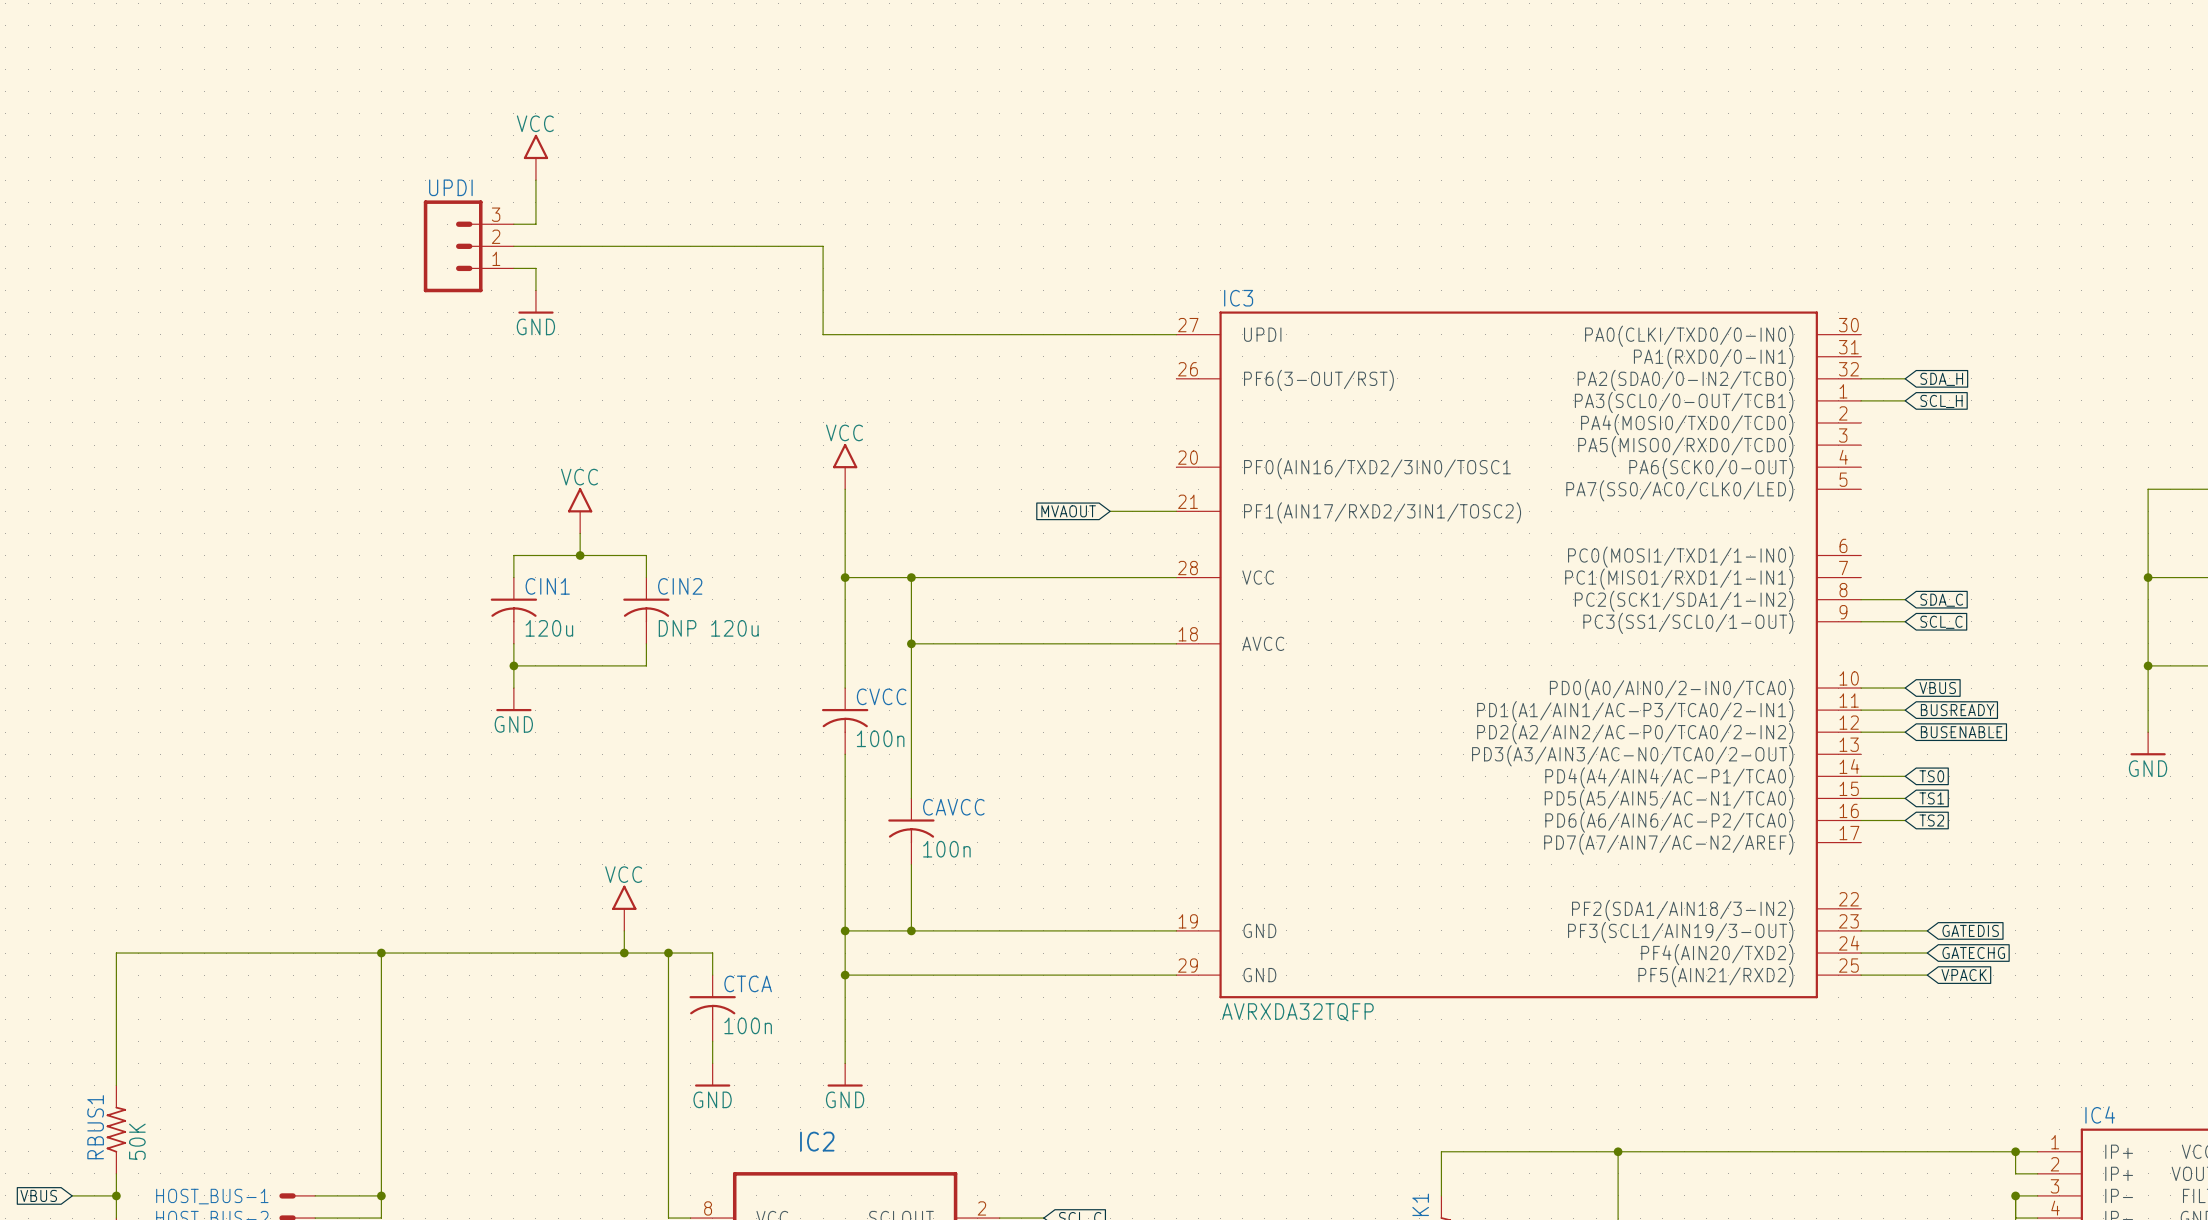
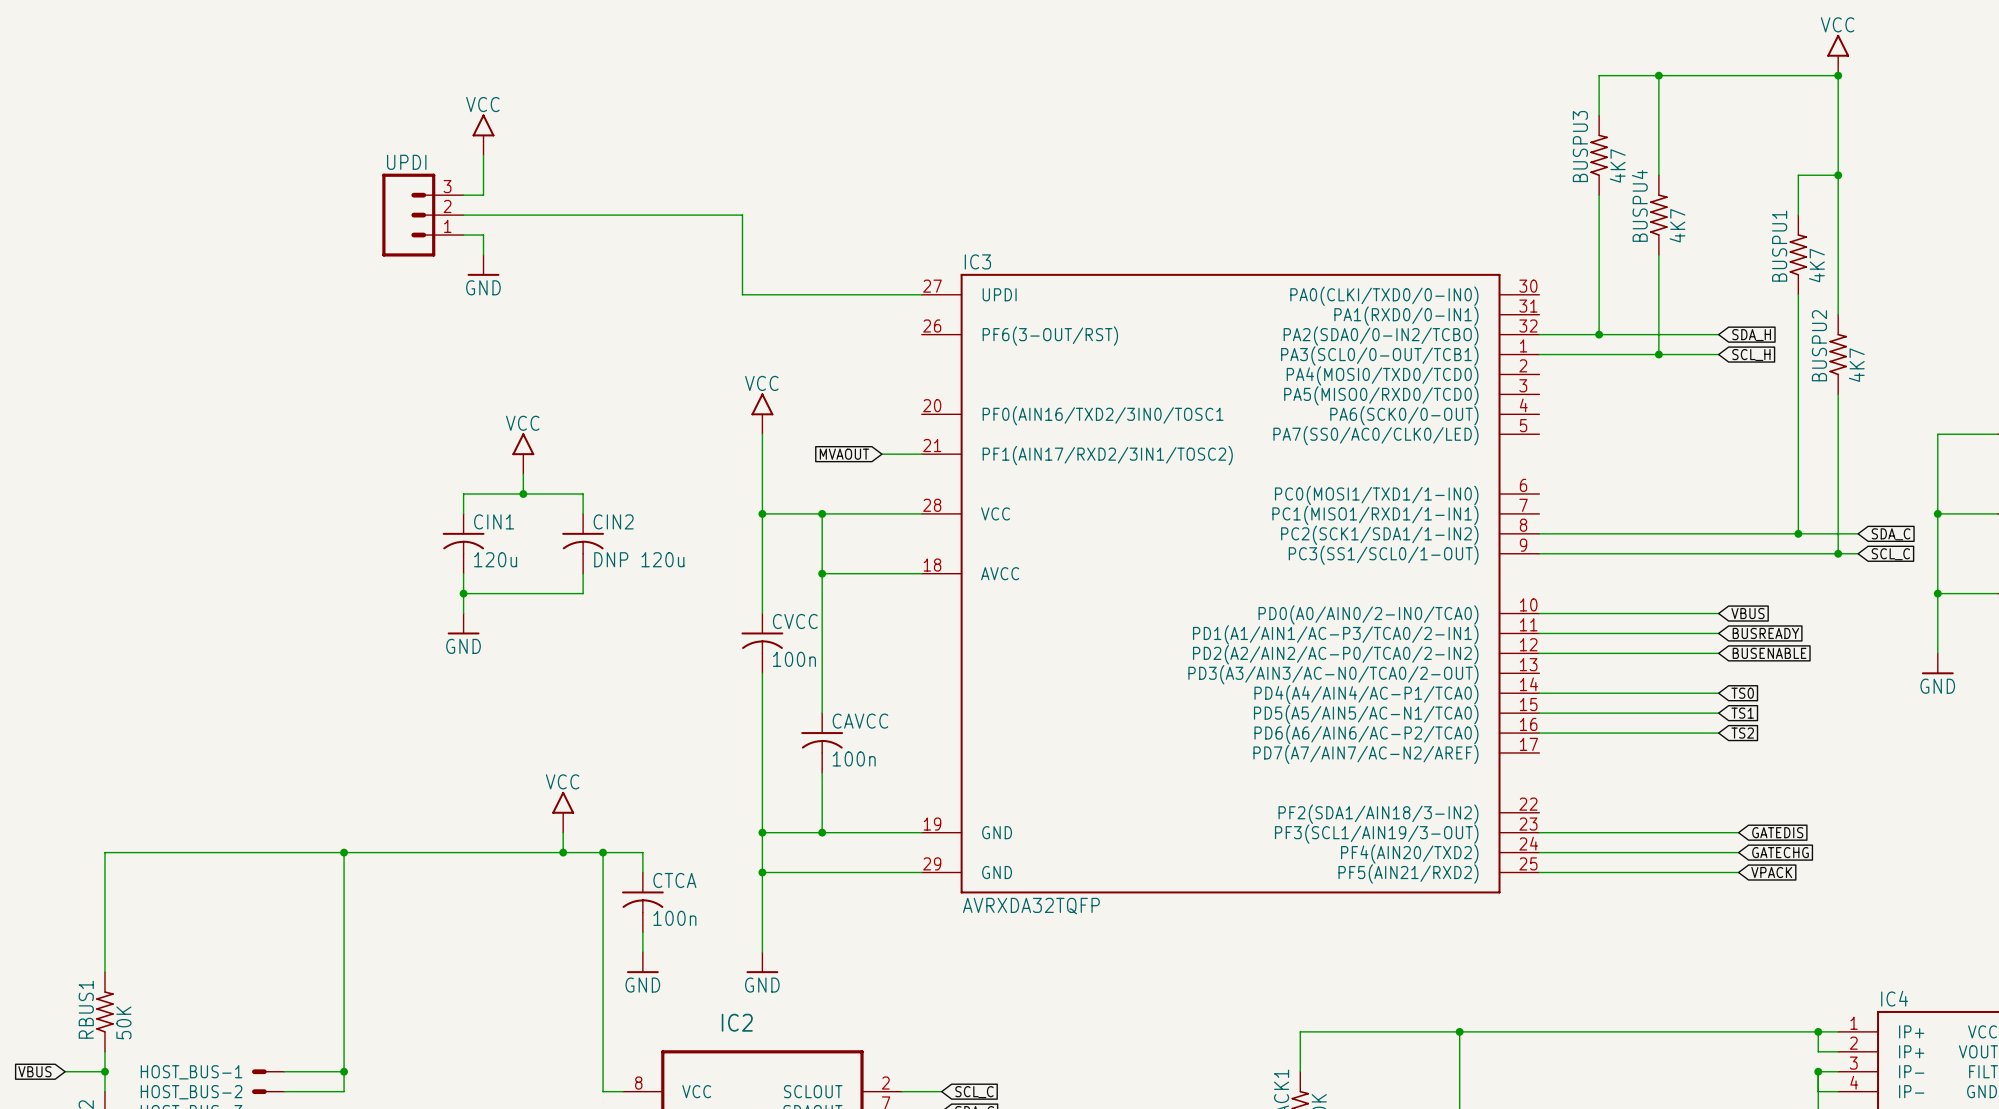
power symbol: none -> (1838, 55)
wire: none -> (1658, 75) (1658, 175)
junction: none -> (1658, 75)
junction: none -> (1838, 75)
wire: none -> (1599, 115) (1599, 75) (1838, 75) (1838, 314)
BUSPU3: none -> 4K7 (1599, 155)
wire: none -> (1838, 175) (1798, 175) (1798, 215)
junction: none -> (1838, 175)
wire: none -> (1599, 195) (1599, 334)
BUSPU4: none -> 4K7 (1658, 215)
wire: none -> (1658, 254) (1658, 354)
BUSPU1: none -> 4K7 (1798, 254)
wire: (1021, 334) (1176, 334) -> none
wire: none -> (1798, 294) (1798, 533)
wire: none -> (1539, 334) (1678, 334)
junction: none -> (1599, 334)
wire: none -> (1539, 354) (1678, 354)
junction: none -> (1658, 354)
BUSPU2: none -> 4K7 (1838, 354)
wire: none -> (1838, 394) (1838, 553)
wire: none -> (881, 454) (921, 454)
global label position: MVAOUT (1068, 511) -> MVAOUT (844, 454)
wire: (1110, 511) (1176, 511) -> none
wire: (1021, 577) (1176, 577) -> none
wire: none -> (1539, 533) (1678, 533)
wire: none -> (1718, 533) (1858, 533)
junction: none -> (1798, 533)
global label position: SDA_C (1941, 600) -> SDA_C (1891, 534)
wire: none -> (1539, 553) (1678, 553)
wire: none -> (1718, 553) (1858, 553)
junction: none -> (1838, 553)
global label position: SCL_C (1941, 622) -> SCL_C (1890, 554)
wire: (1021, 643) (1176, 643) -> none
IC3 position: (1518, 654) -> (1230, 583)
wire: none -> (1539, 613) (1678, 613)
wire: none -> (1539, 633) (1678, 633)
wire: none -> (1539, 653) (1678, 653)
wire: none -> (1539, 693) (1678, 693)
wire: none -> (1539, 713) (1678, 713)
wire: none -> (1539, 733) (1678, 733)
wire: (1021, 930) (1176, 930) -> none
wire: none -> (1539, 832) (1678, 832)
wire: none -> (1539, 852) (1678, 852)
wire: (1021, 975) (1176, 975) -> none
wire: none -> (1539, 872) (1678, 872)

